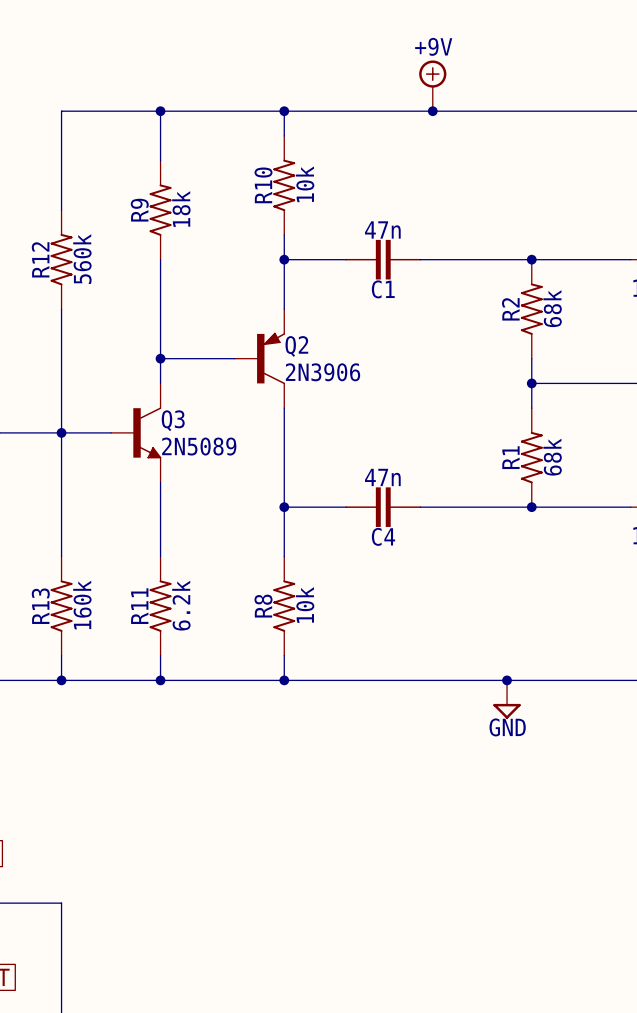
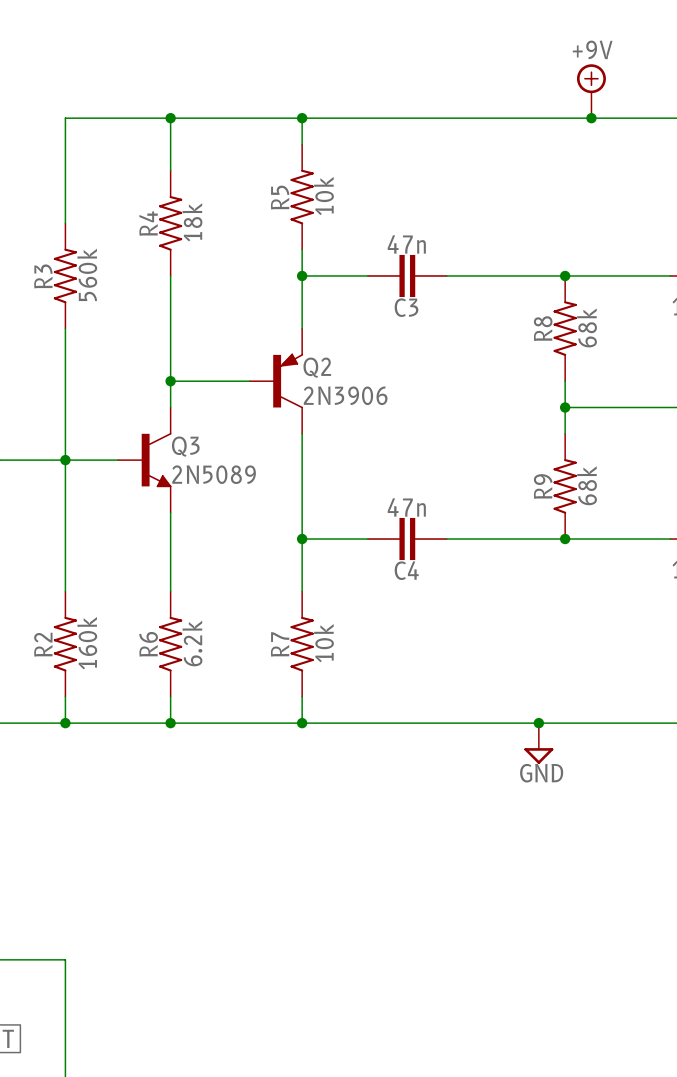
power symbol position: +9V (432, 85) -> +9V (591, 91)
junction: (432, 111) -> none
junction: none -> (591, 118)
R10 name: R10 (263, 185) -> R5 (280, 197)
R9 name: R9 (139, 210) -> R4 (148, 223)
R12 name: R12 (40, 259) -> R3 (43, 276)
C1 name: C1 (383, 289) -> C3 (406, 307)
R2 name: R2 (510, 309) -> R8 (543, 328)
R1 name: R1 (510, 457) -> R9 (543, 486)
R13 name: R13 (40, 606) -> R2 (43, 644)
R11 name: R11 (139, 606) -> R6 (148, 644)
R8 name: R8 (263, 606) -> R7 (280, 644)

